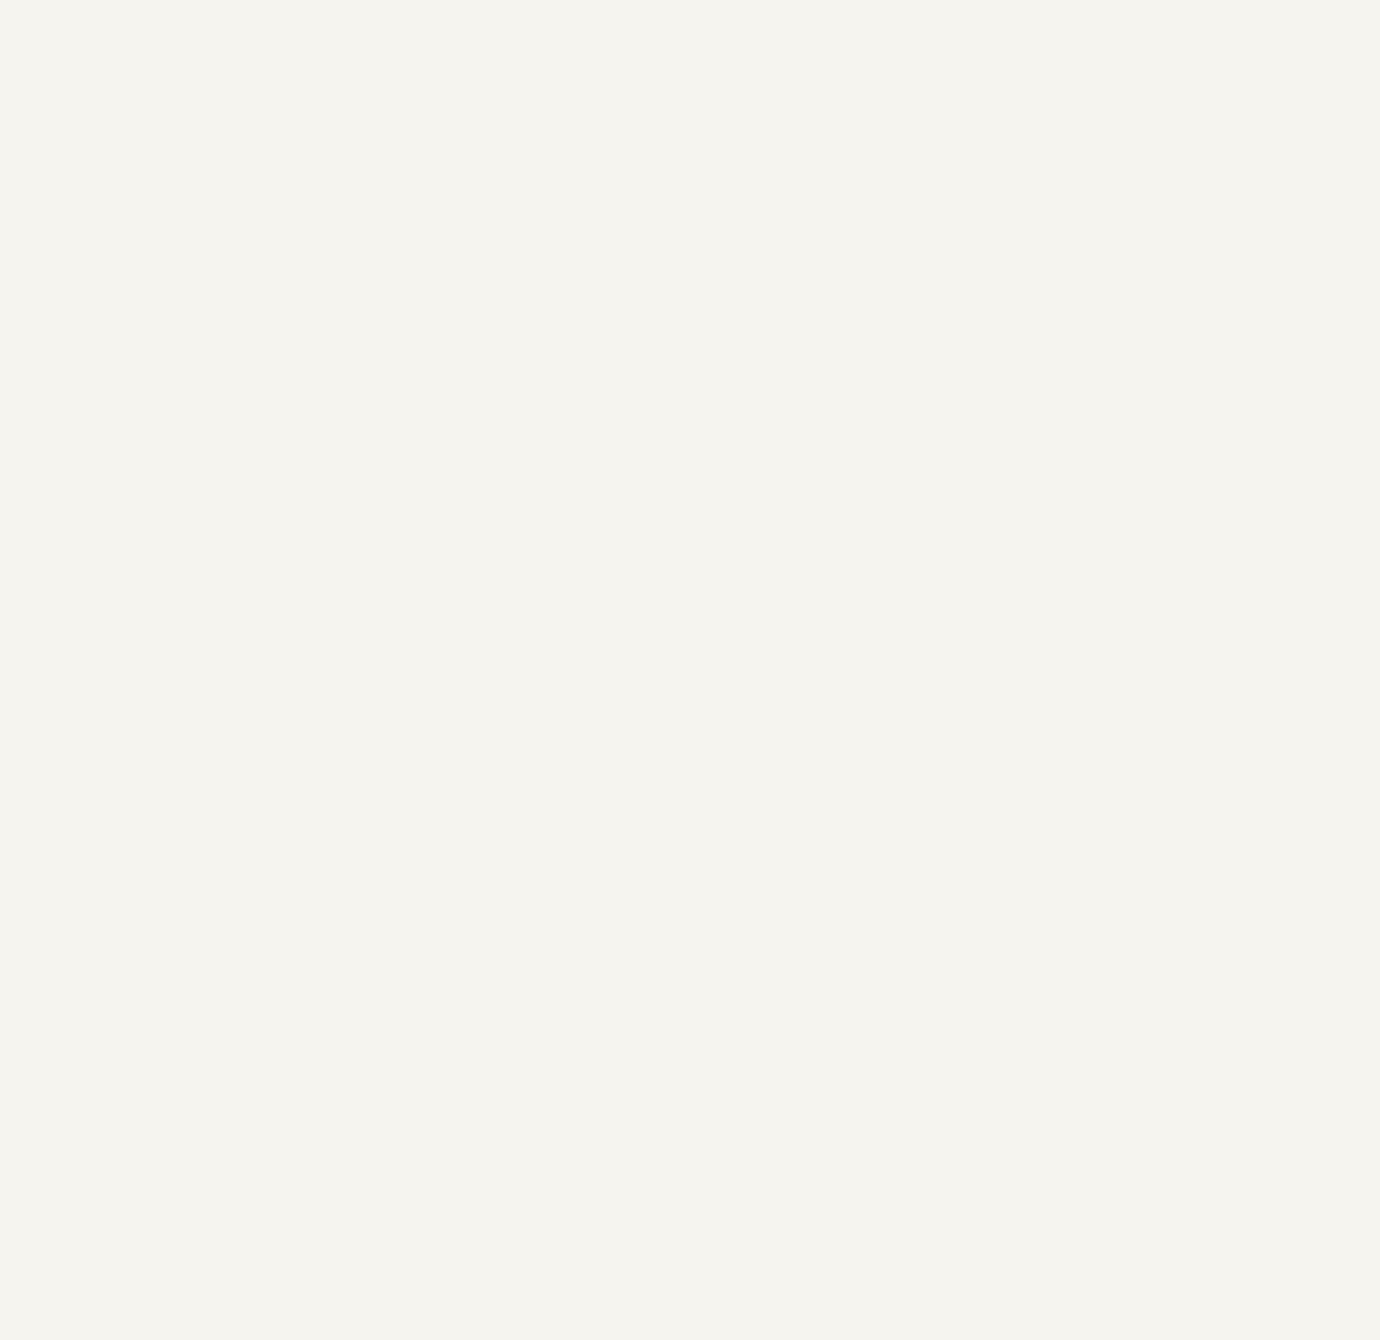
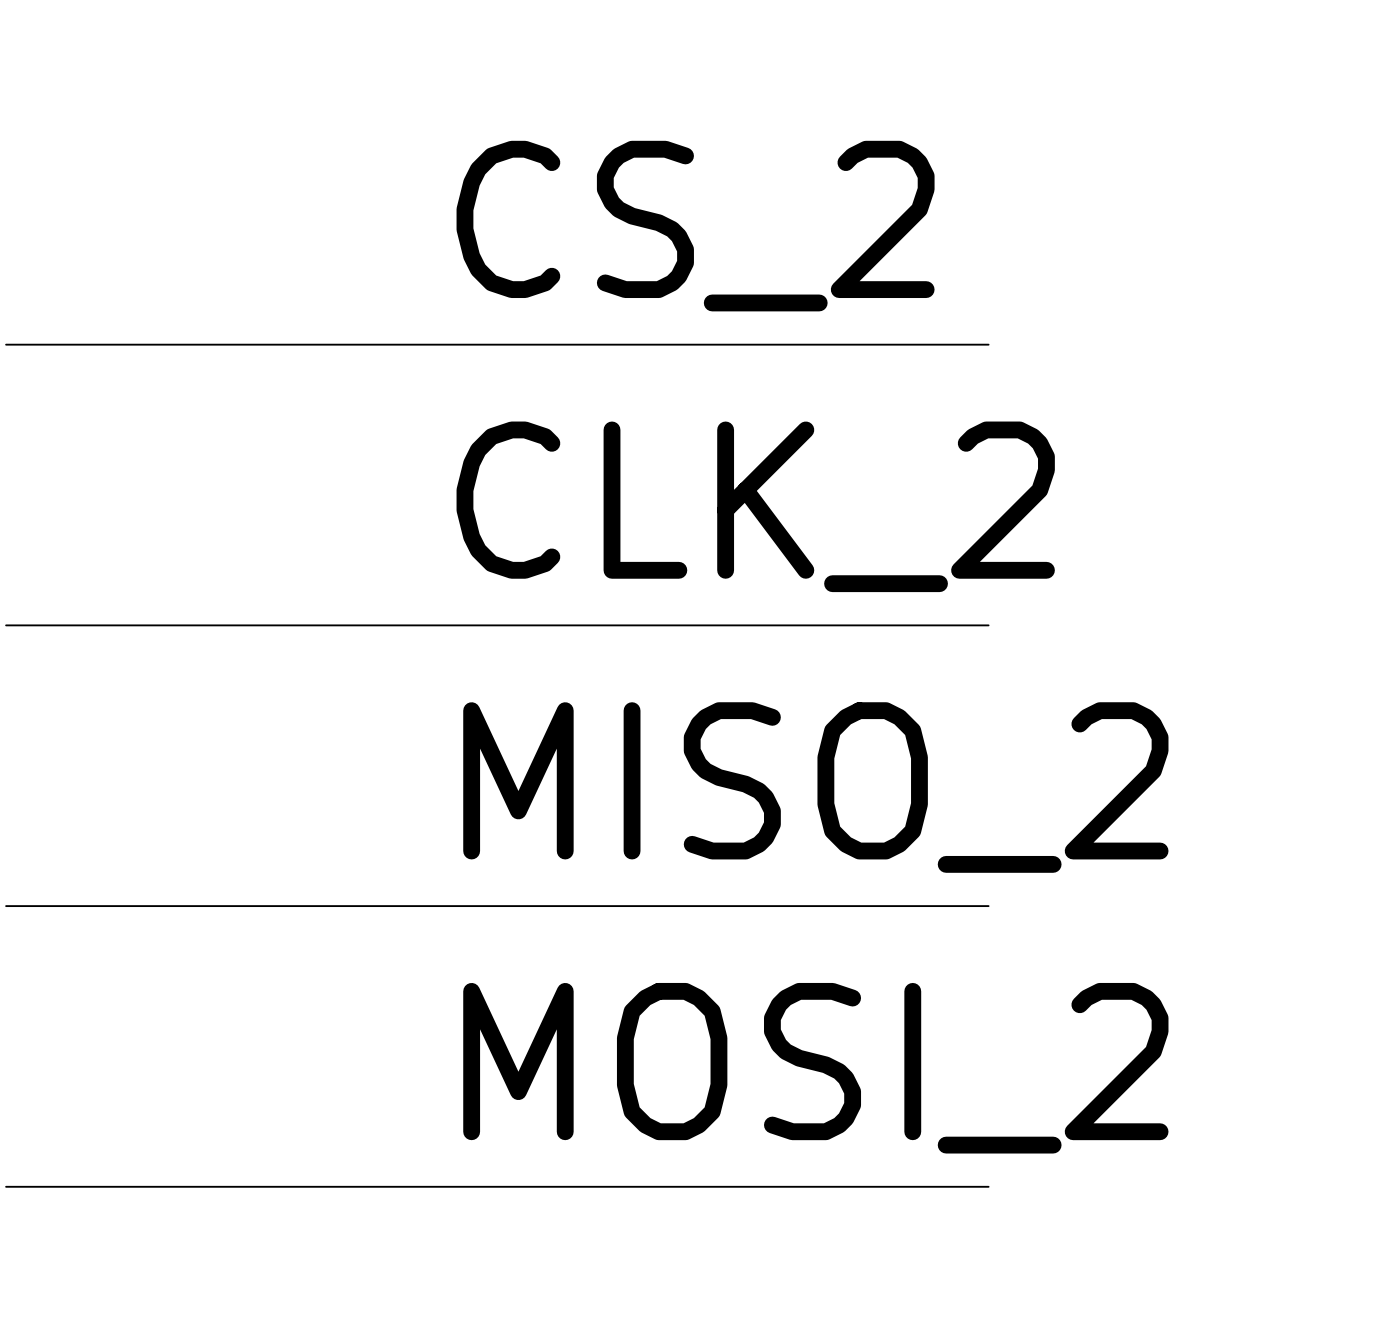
label: none -> CS_2 (695, 226)
wire: none -> (6, 344) (988, 344)
label: none -> CLK_2 (755, 506)
wire: none -> (6, 625) (988, 625)
label: none -> MISO_2 (815, 787)
wire: none -> (6, 906) (988, 906)
label: none -> MOSI_2 (815, 1068)
wire: none -> (6, 1186) (988, 1186)

